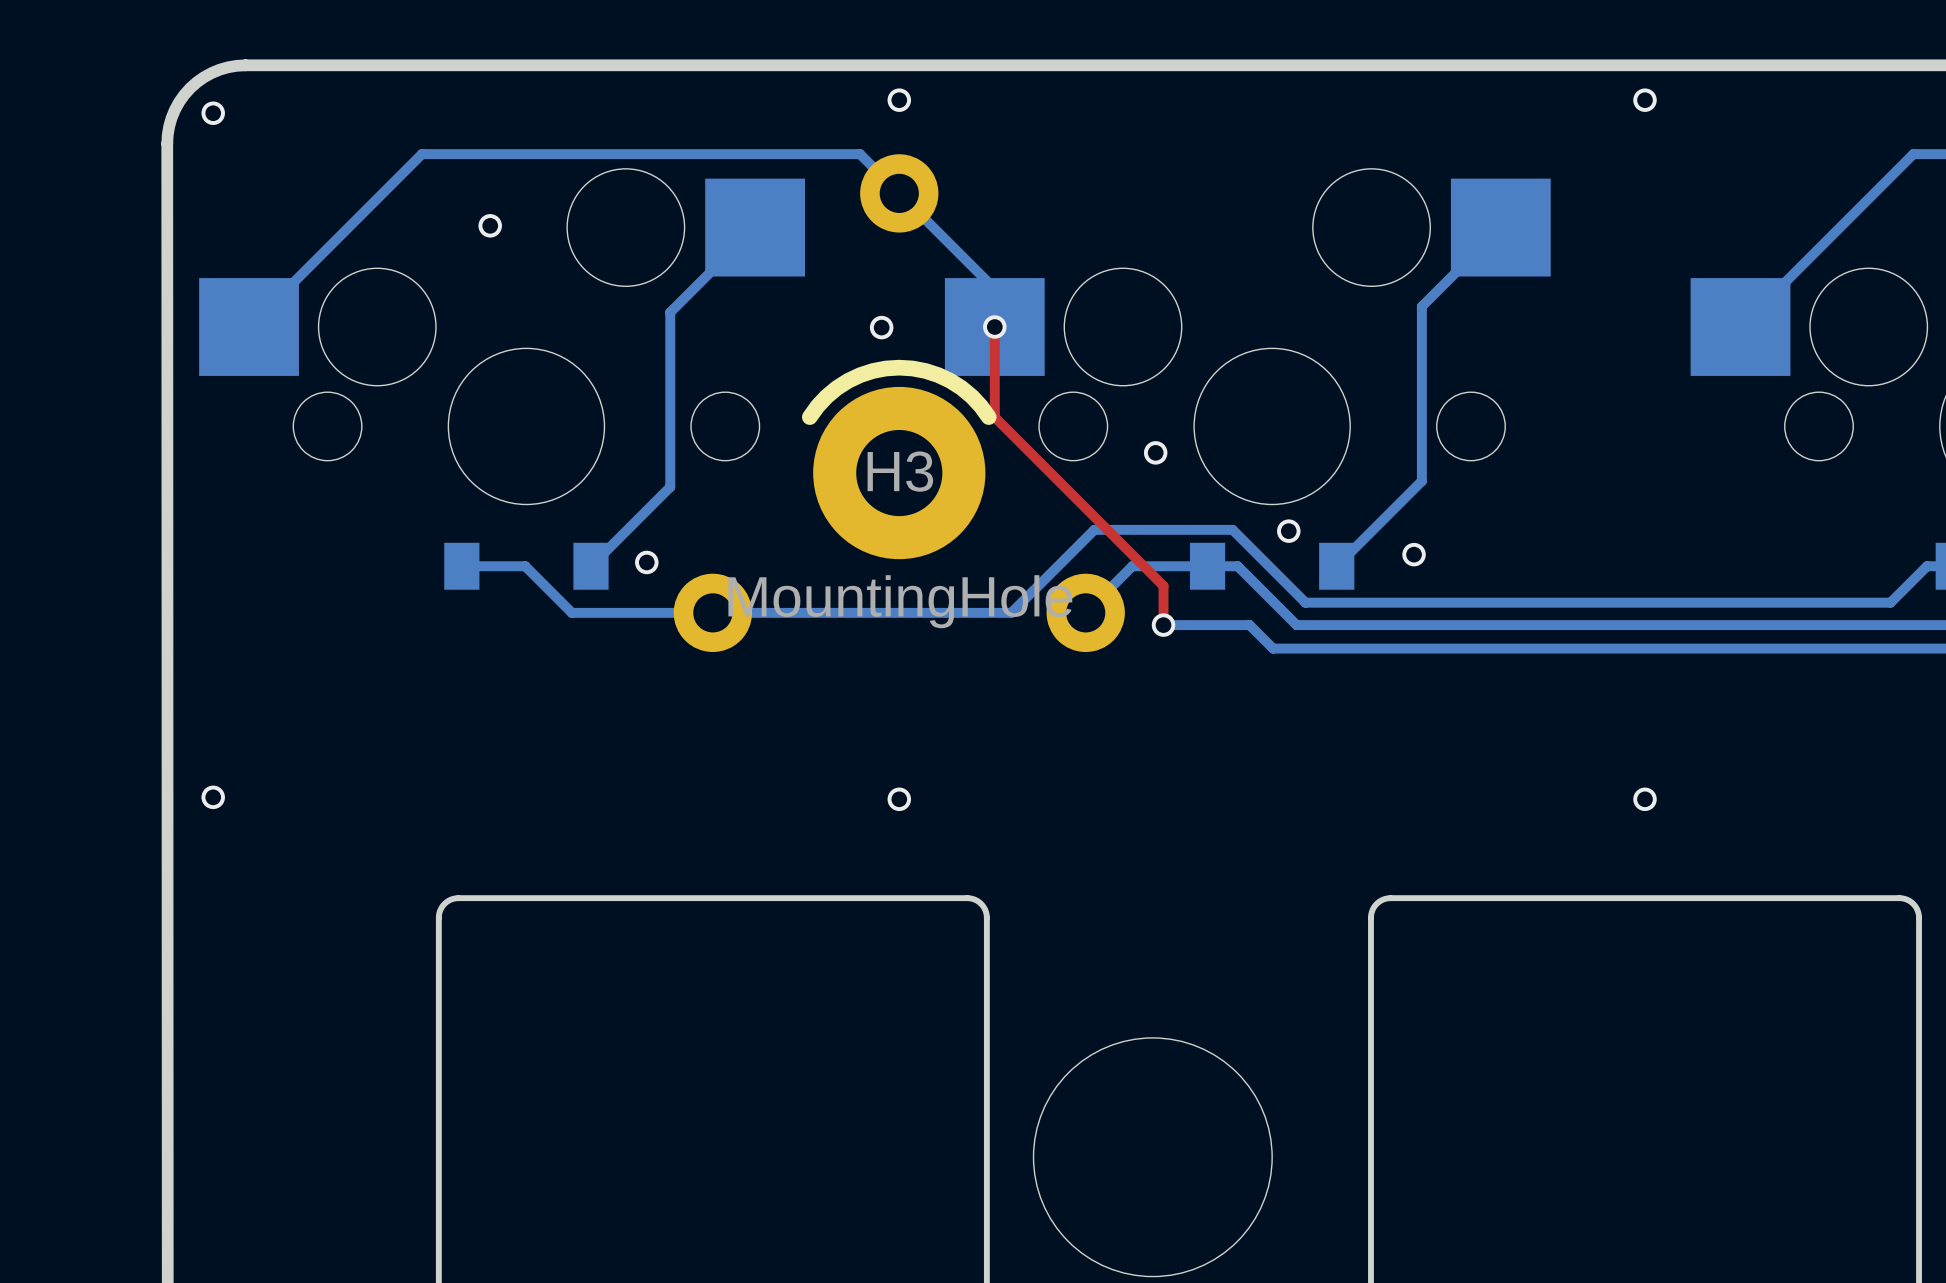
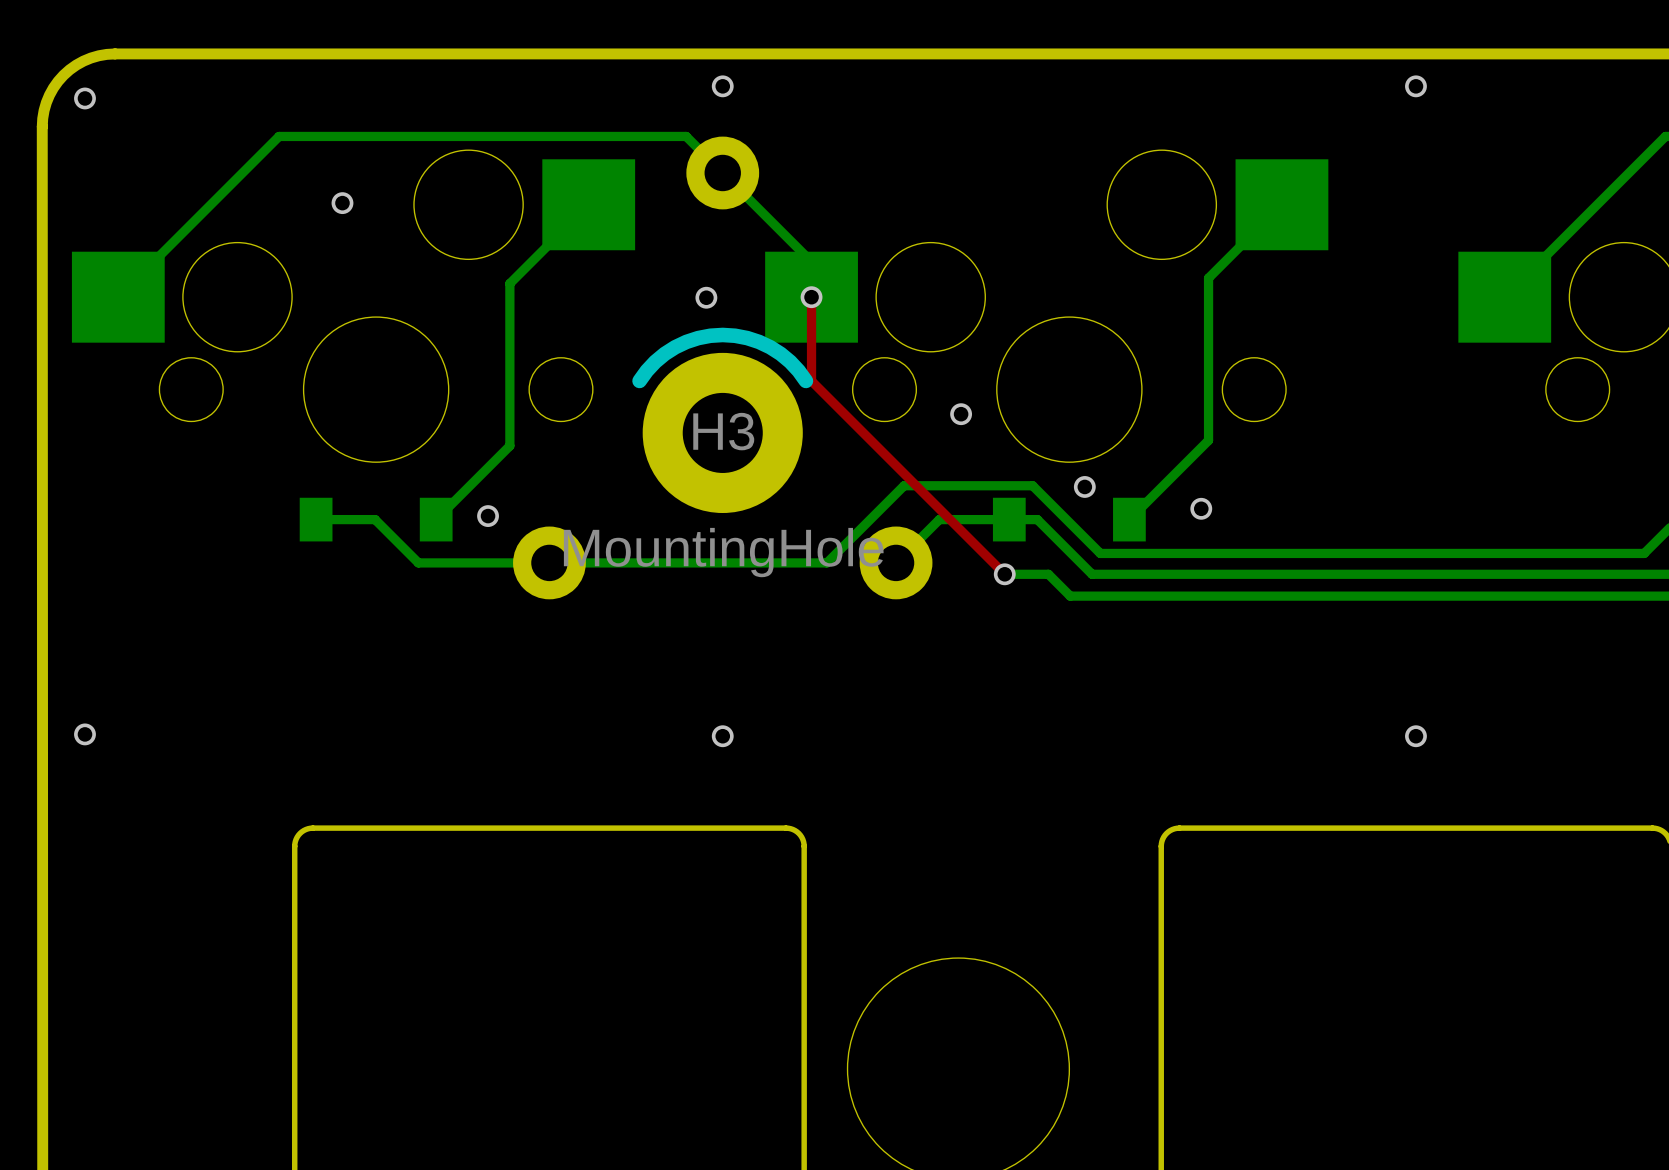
top track: (1163, 585) (1163, 625) -> (968, 537) (1004, 574)
bottom track: (1163, 625) (1202, 625) -> none
via position: (1163, 625) -> (1004, 574)

